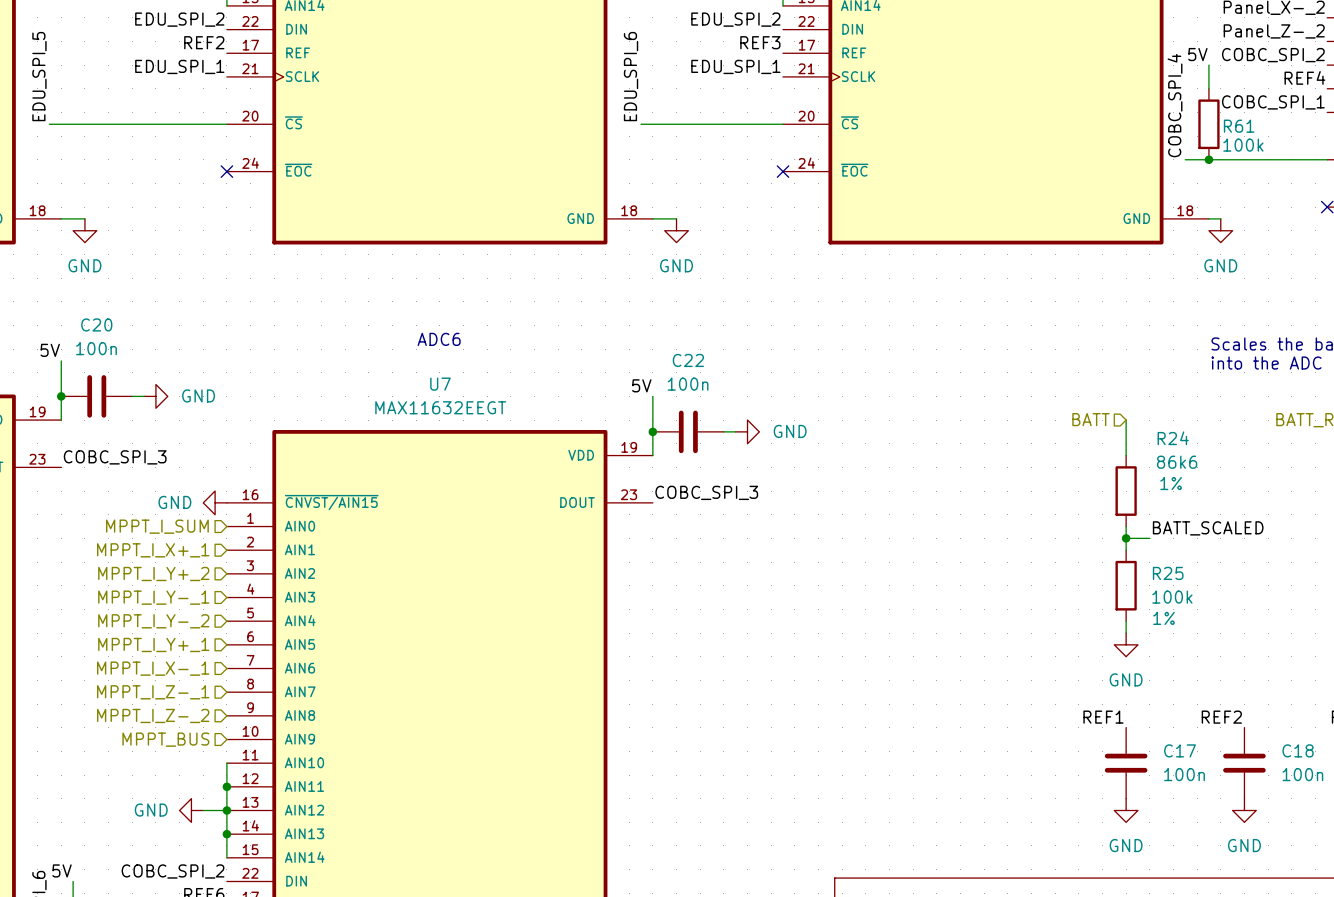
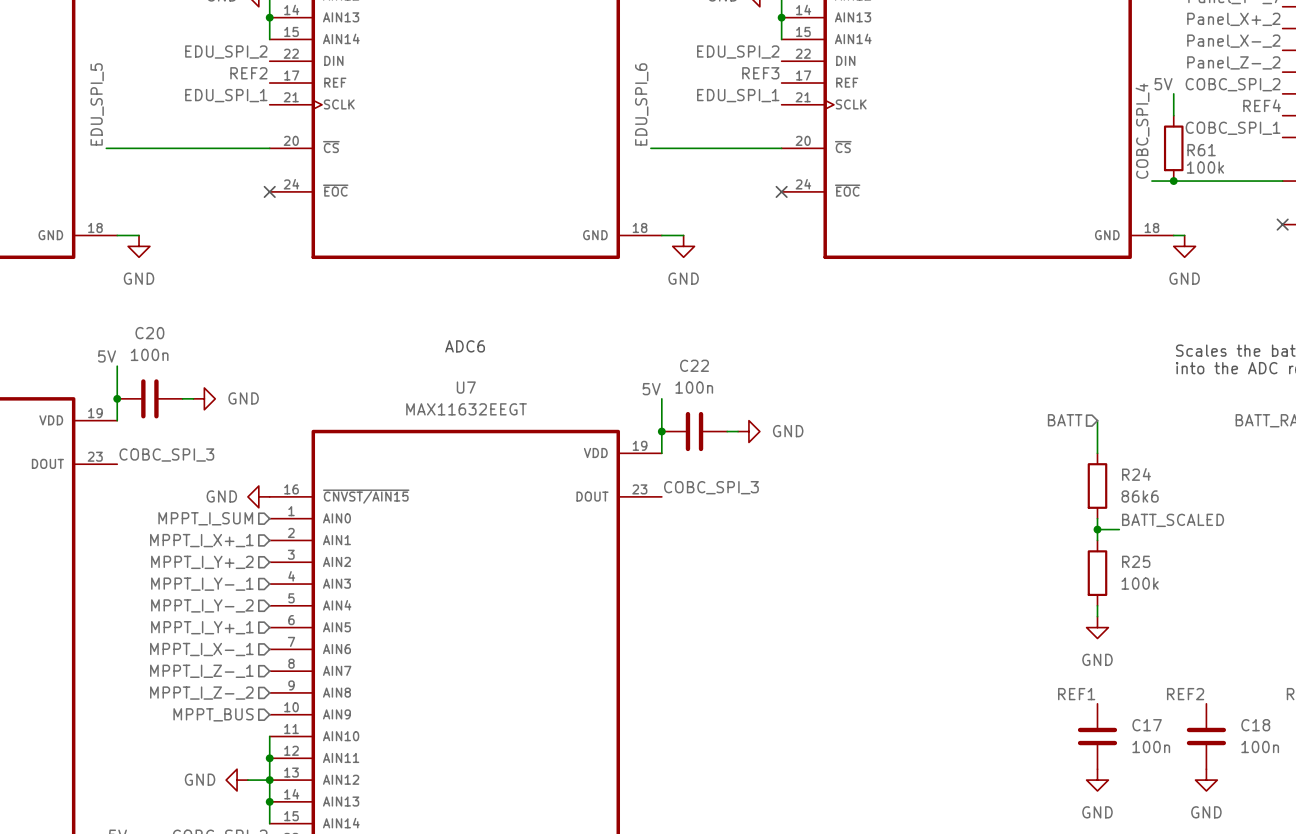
R24 name position: R24 (1173, 438) -> R24 (1136, 474)
R24 value position: 86k6 (1177, 462) -> 86k6 (1140, 496)
R24 text: 1% (1171, 483) -> none
R25 text: 1% (1163, 618) -> none

